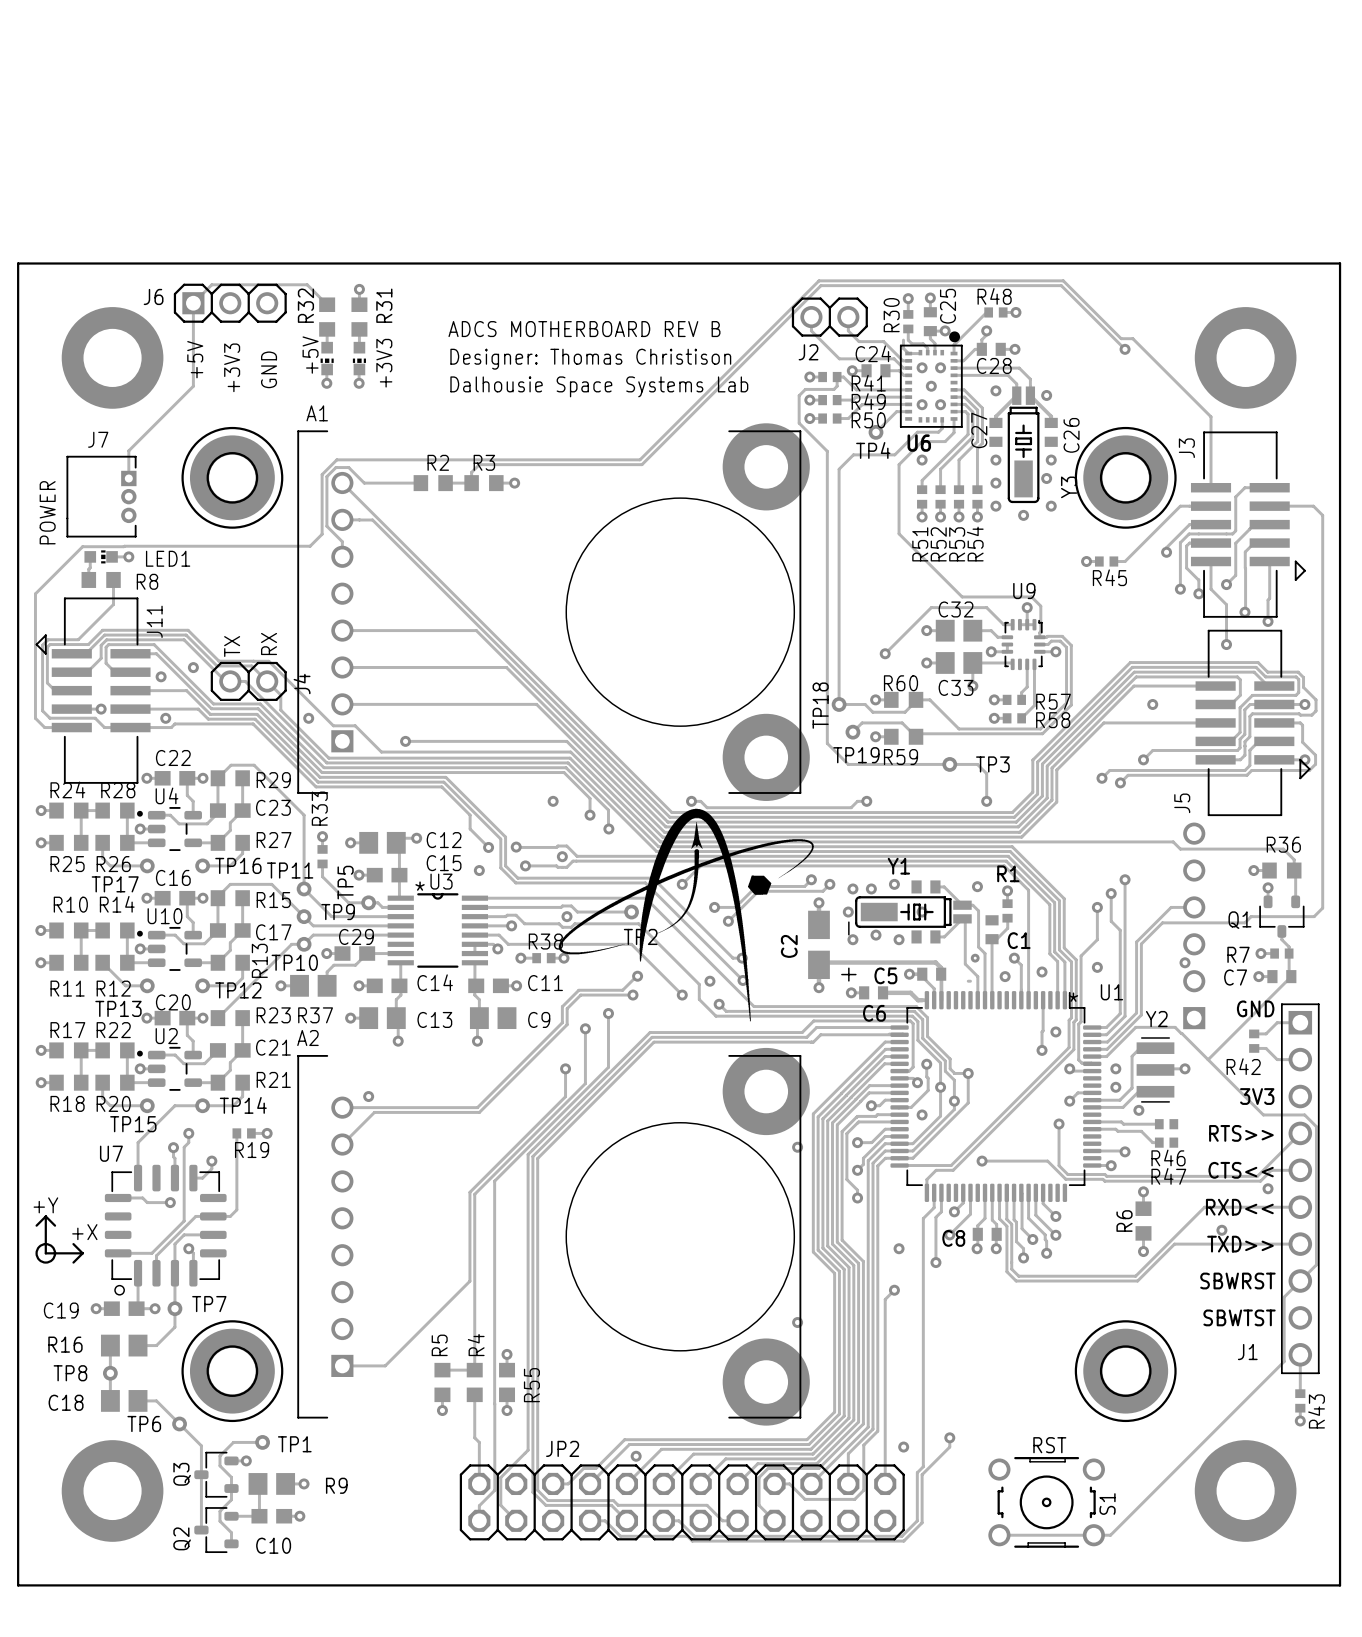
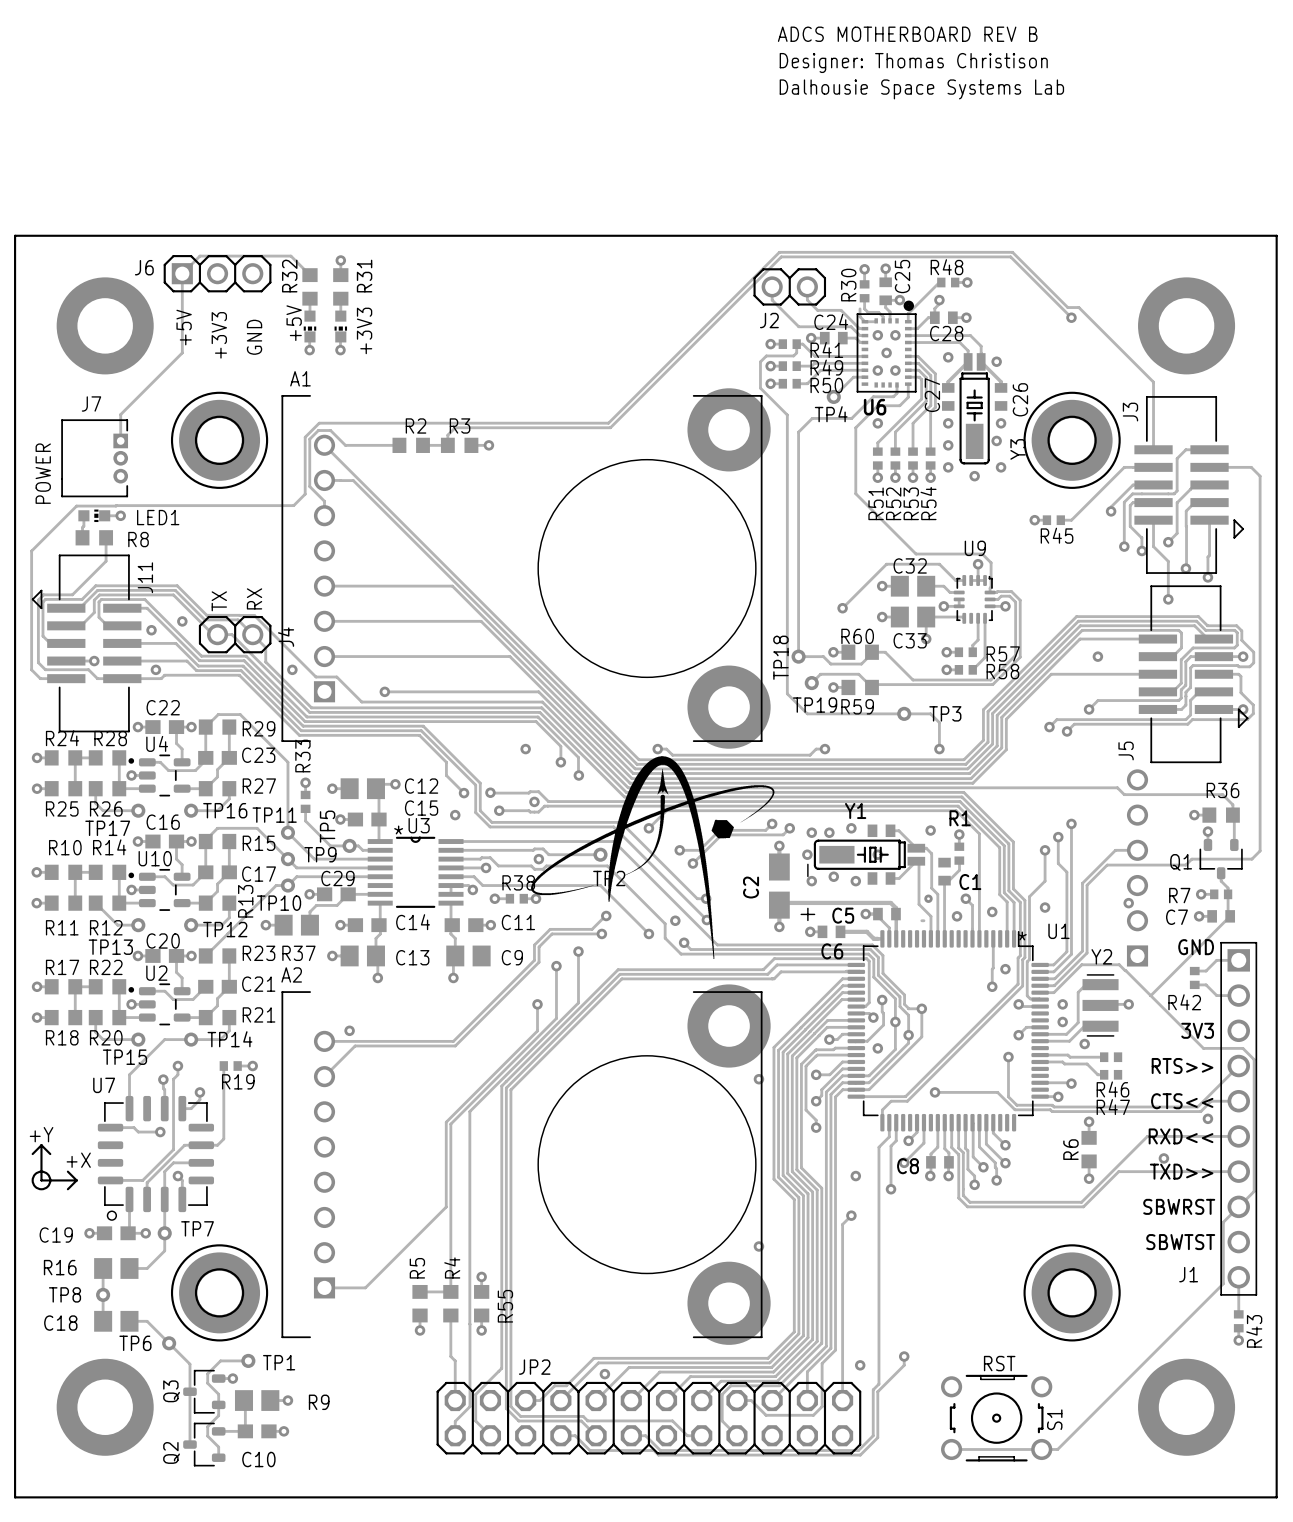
text: none -> ADCS MOTHERBOARD REV B (907, 34)
text: none -> Designer: Thomas Christison (913, 62)
text: none -> Dalhousie Space Systems Lab (921, 89)
text: ADCS MOTHERBOARD REV B (584, 329) -> none
text: Designer: Thomas Christison (590, 359) -> none
text: Dalhousie Space Systems Lab (599, 386) -> none

